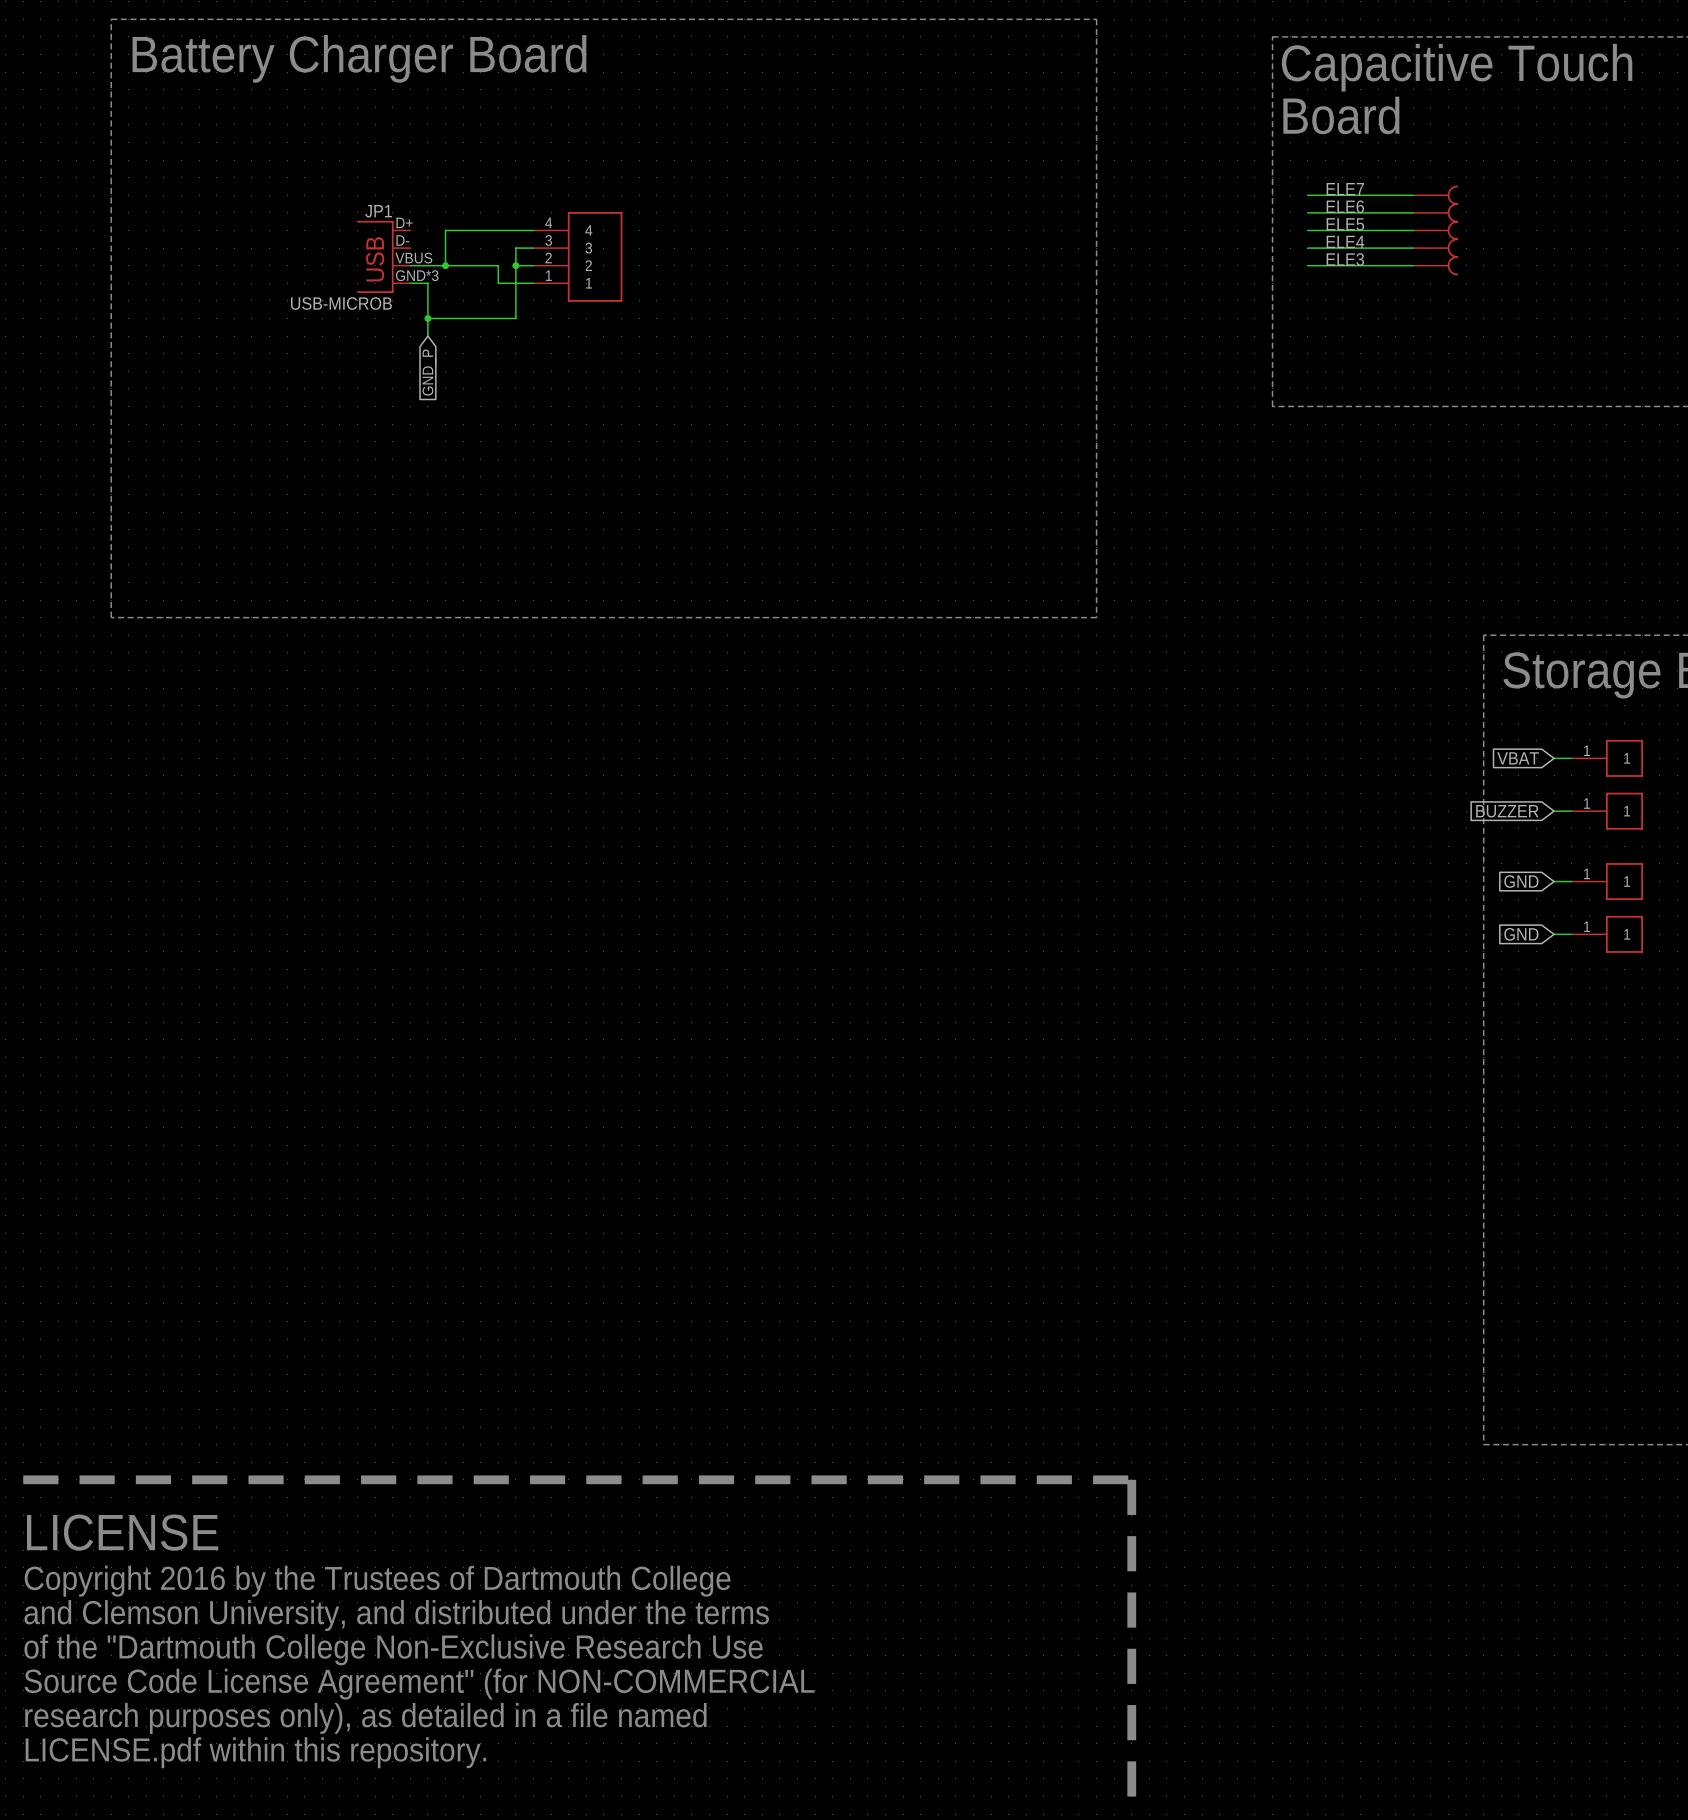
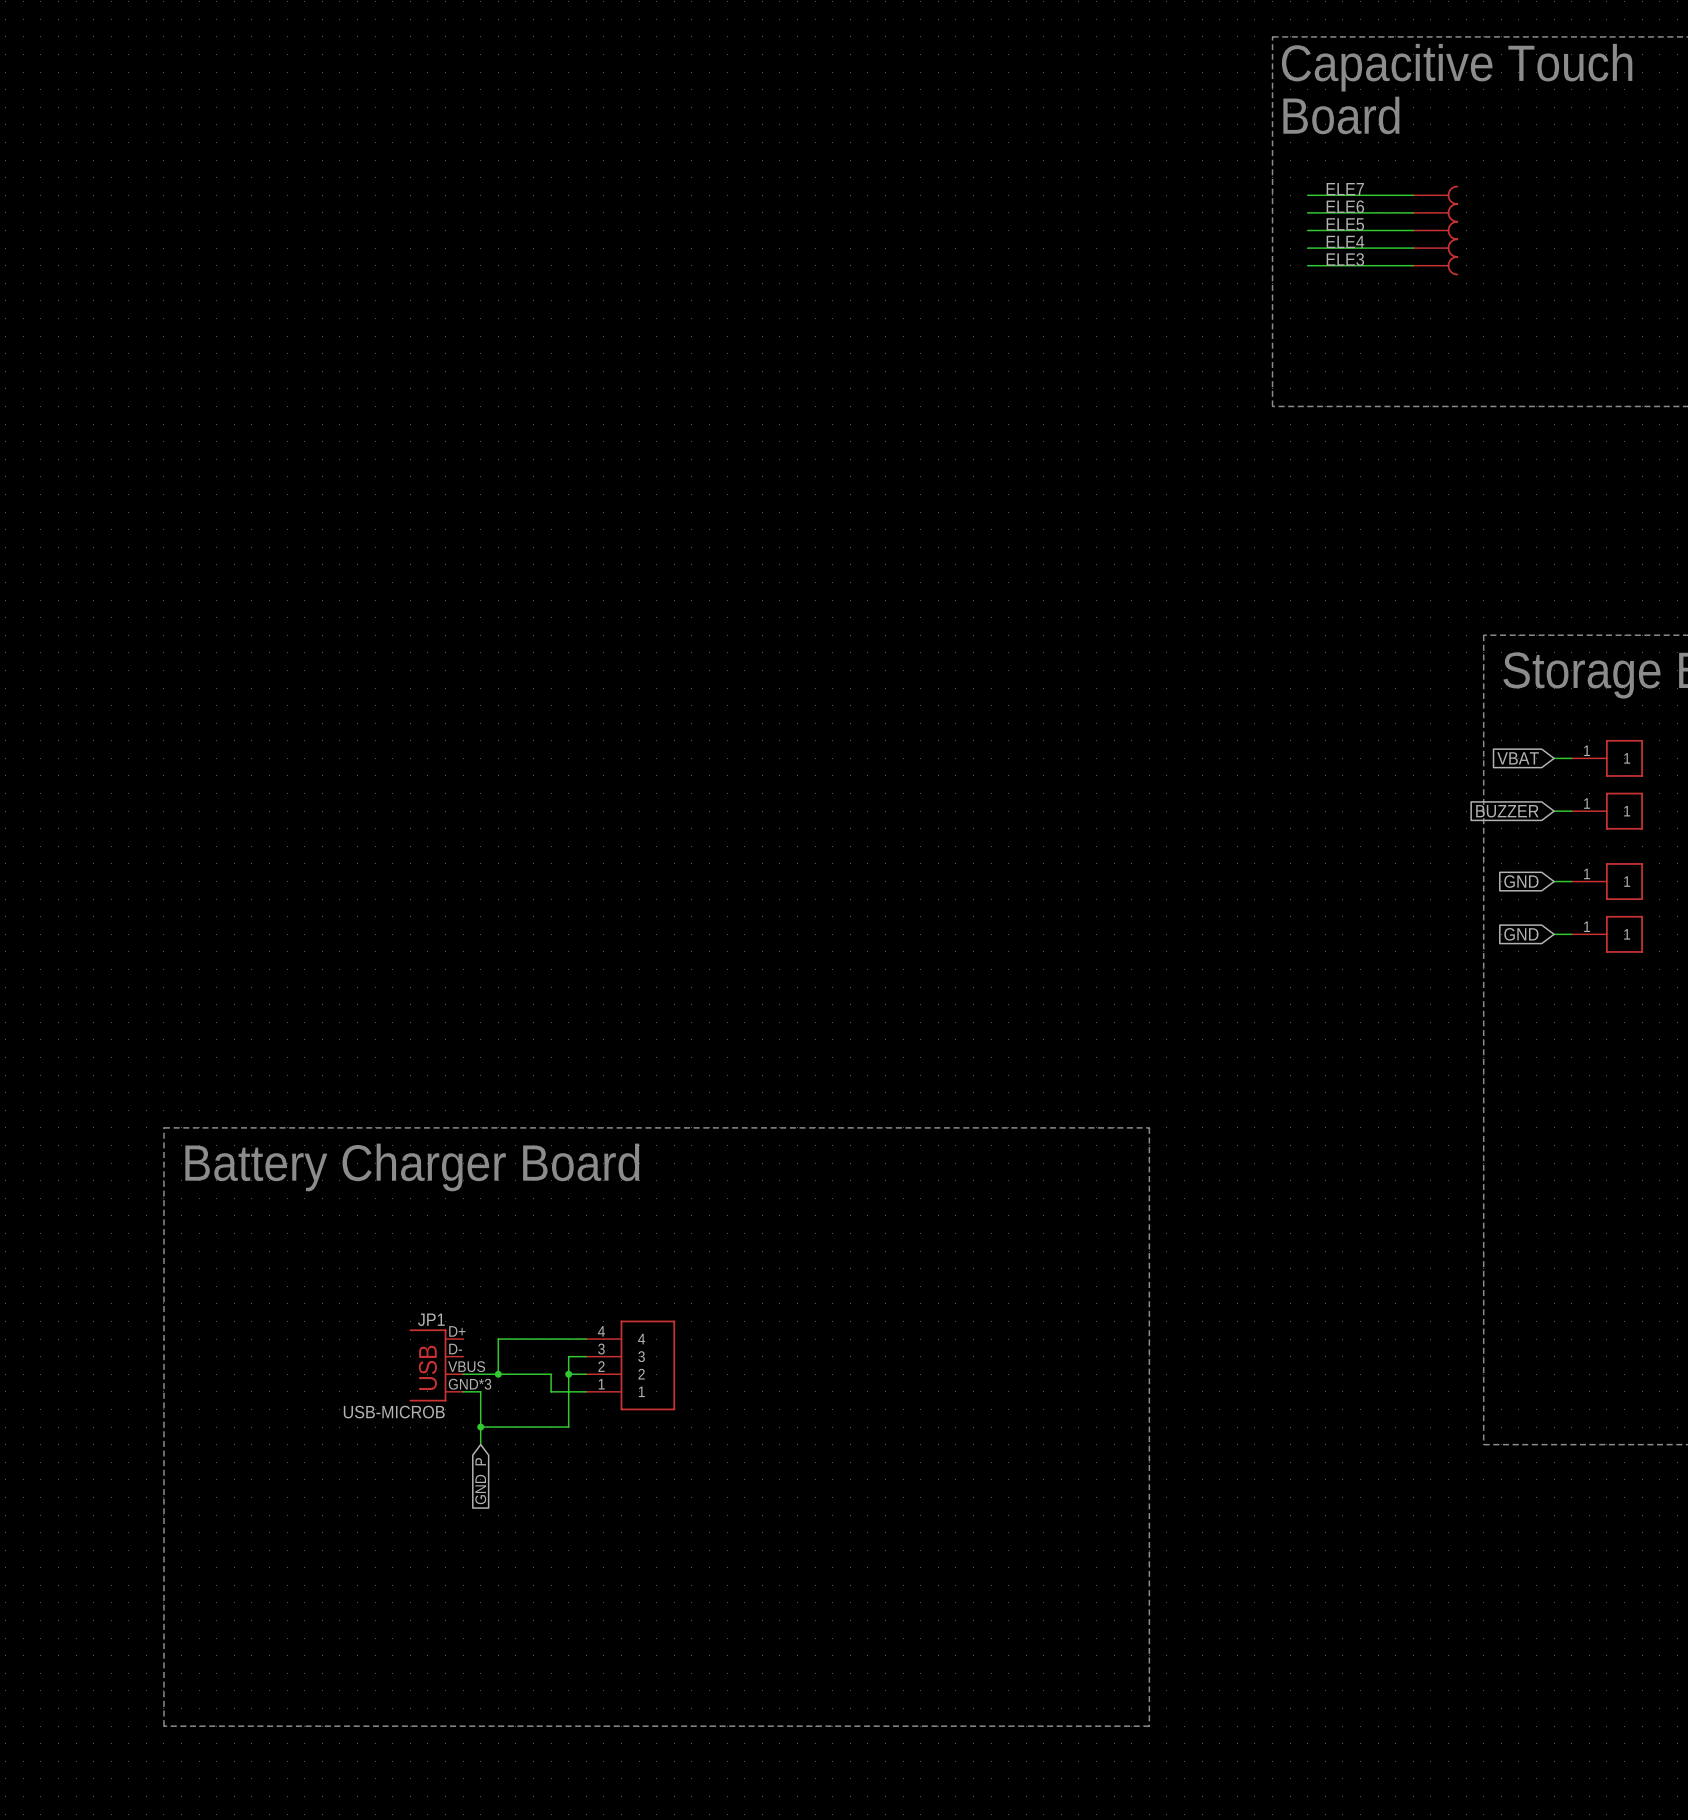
line: (111, 19) (1096, 19) (1096, 617) (111, 617) (111, 19) -> none
text: Battery Charger Board (359, 58) -> none
wire: (533, 230) (445, 230) (445, 265) -> none
wire: (533, 248) (515, 248) (515, 318) (427, 318) -> none
JP1 position: (383, 256) -> (436, 1365)
part: (577, 256) -> none
wire: (410, 265) (498, 265) (498, 283) (533, 283) -> none
junction: (445, 265) -> none
wire: (515, 265) (533, 265) -> none
junction: (515, 265) -> none
wire: (410, 283) (427, 283) (427, 336) -> none
junction: (427, 318) -> none
global label: GND_P (429, 372) -> none
line: none -> (163, 1127) (1149, 1127) (1149, 1726) (163, 1726) (163, 1127)
text: none -> Battery Charger Board (412, 1167)
wire: none -> (586, 1339) (498, 1339) (498, 1374)
wire: none -> (586, 1356) (568, 1356) (568, 1427) (480, 1427)
part: none -> (630, 1365)
wire: none -> (463, 1374) (551, 1374) (551, 1391) (586, 1391)
junction: none -> (498, 1374)
wire: none -> (568, 1374) (586, 1374)
junction: none -> (568, 1374)
wire: none -> (463, 1391) (480, 1391) (480, 1444)
junction: none -> (480, 1427)
line: (23, 1479) (1131, 1479) (1131, 1796) -> none
global label: none -> GND_P (482, 1481)
text: LICENSE (122, 1532) -> none
text: Copyright 2016 by the Trustees of Dartmouth College (377, 1581) -> none
text: and Clemson University, and distributed under the terms (396, 1615) -> none
text: of the "Dartmouth College Non-Exclusive Research Use (393, 1649) -> none
text: Source Code License Agreement" (for NON-COMMERCIAL (419, 1684) -> none
text: research purposes only), as detailed in a file named (365, 1718) -> none
text: LICENSE.pdf within this repository. (255, 1752) -> none

